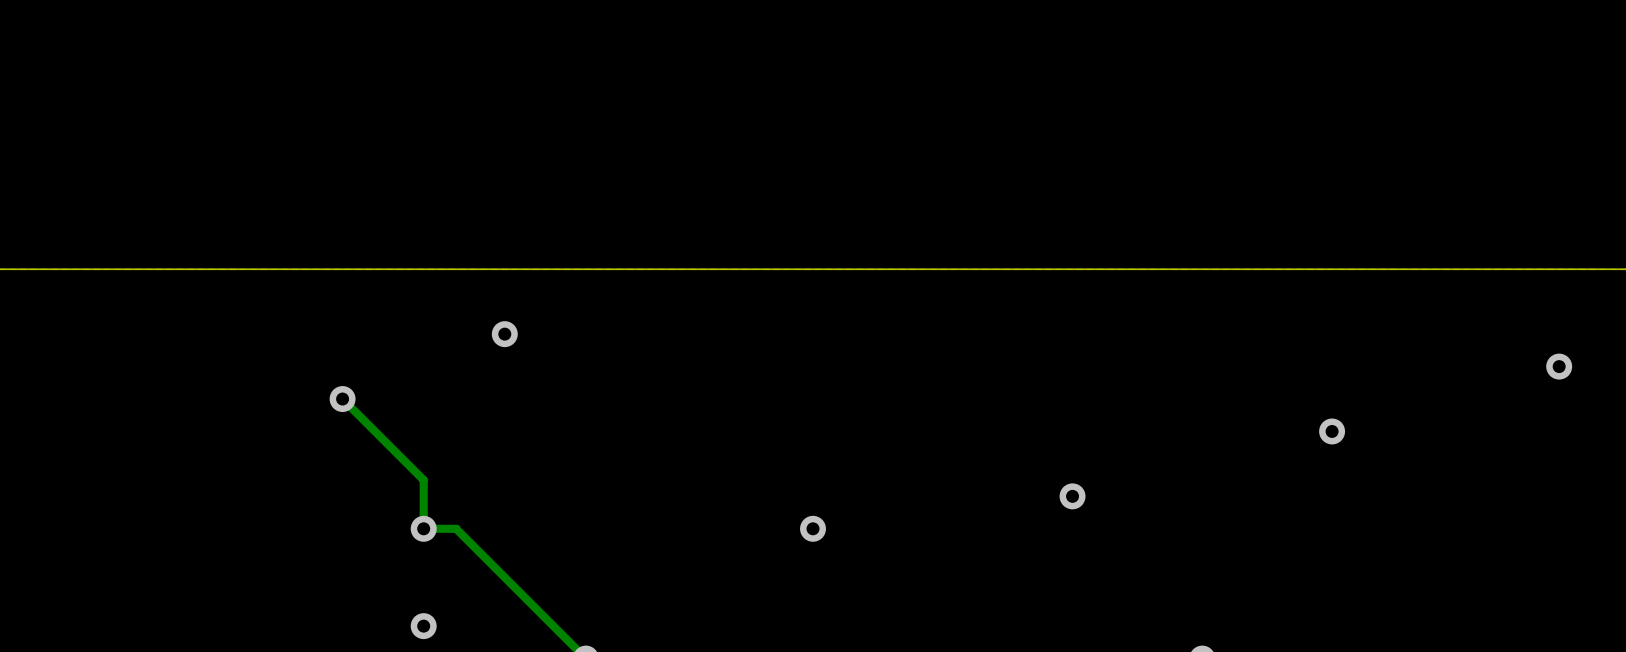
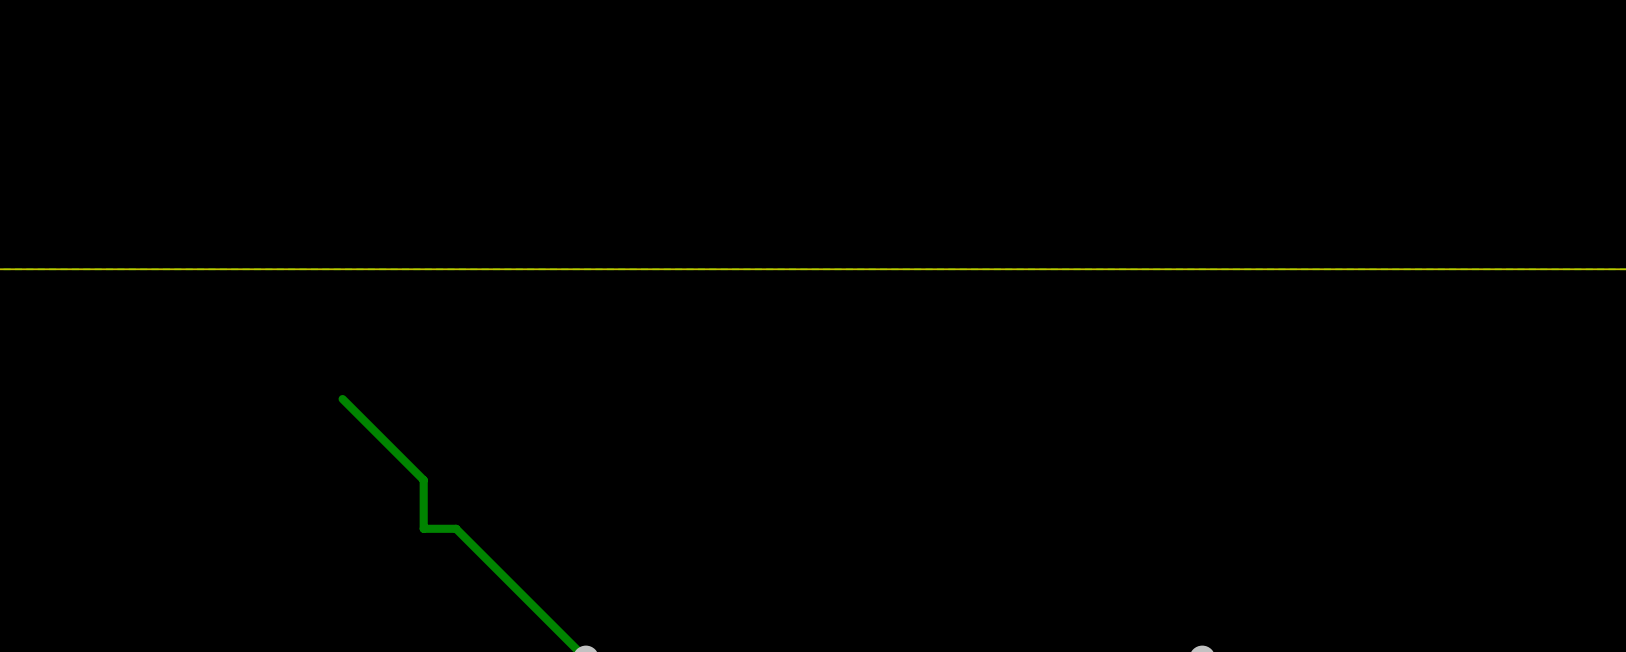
via: (504, 334) -> none
via: (1559, 366) -> none
via: (342, 399) -> none
via: (1332, 431) -> none
via: (1072, 496) -> none
via: (423, 528) -> none
via: (813, 528) -> none
via: (423, 626) -> none

